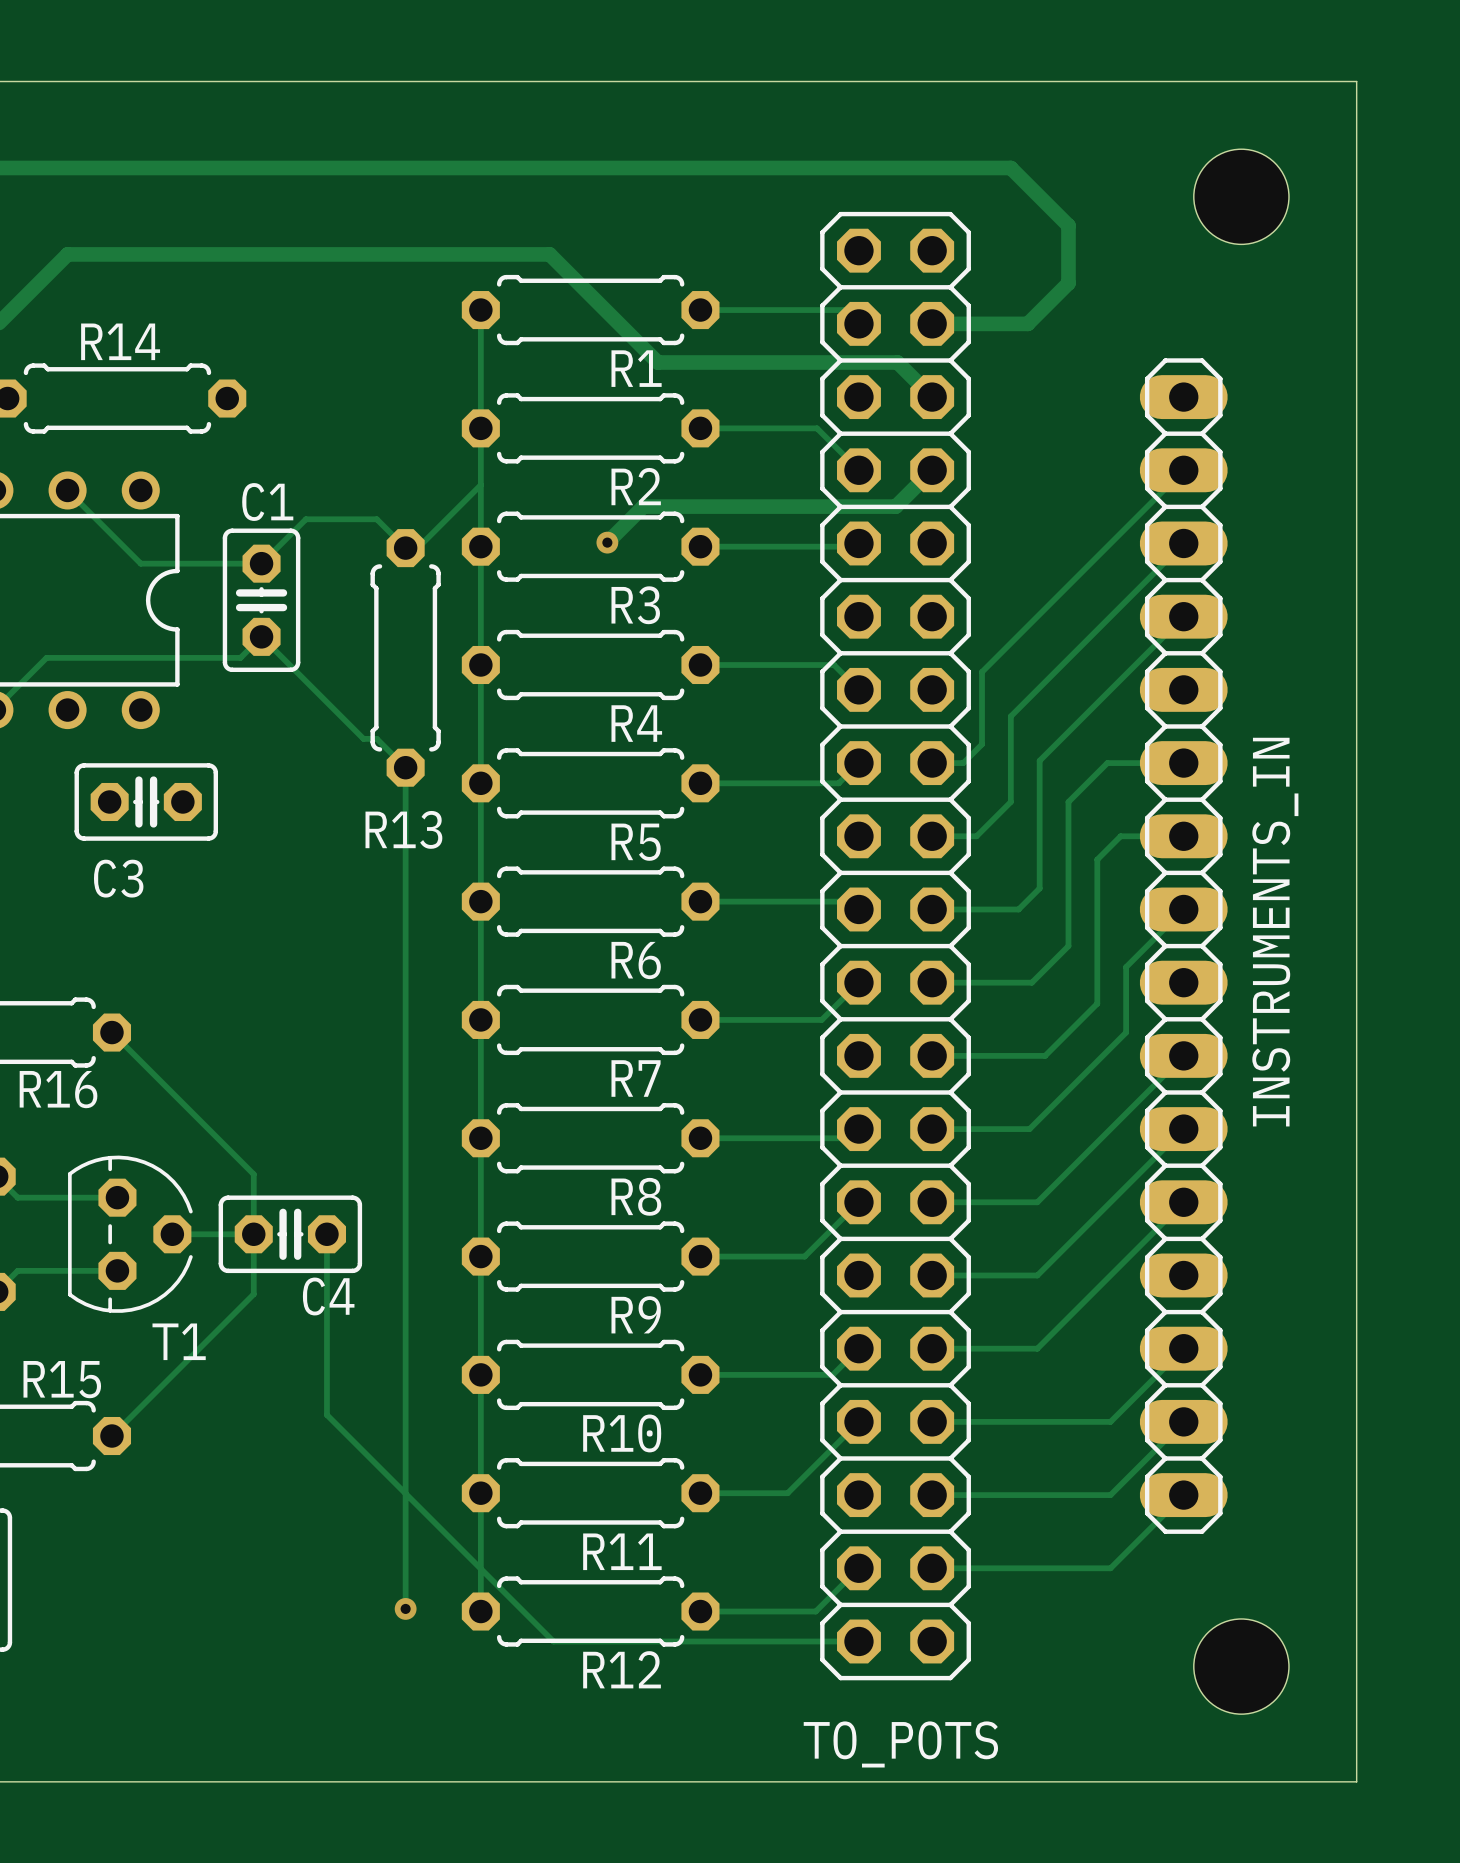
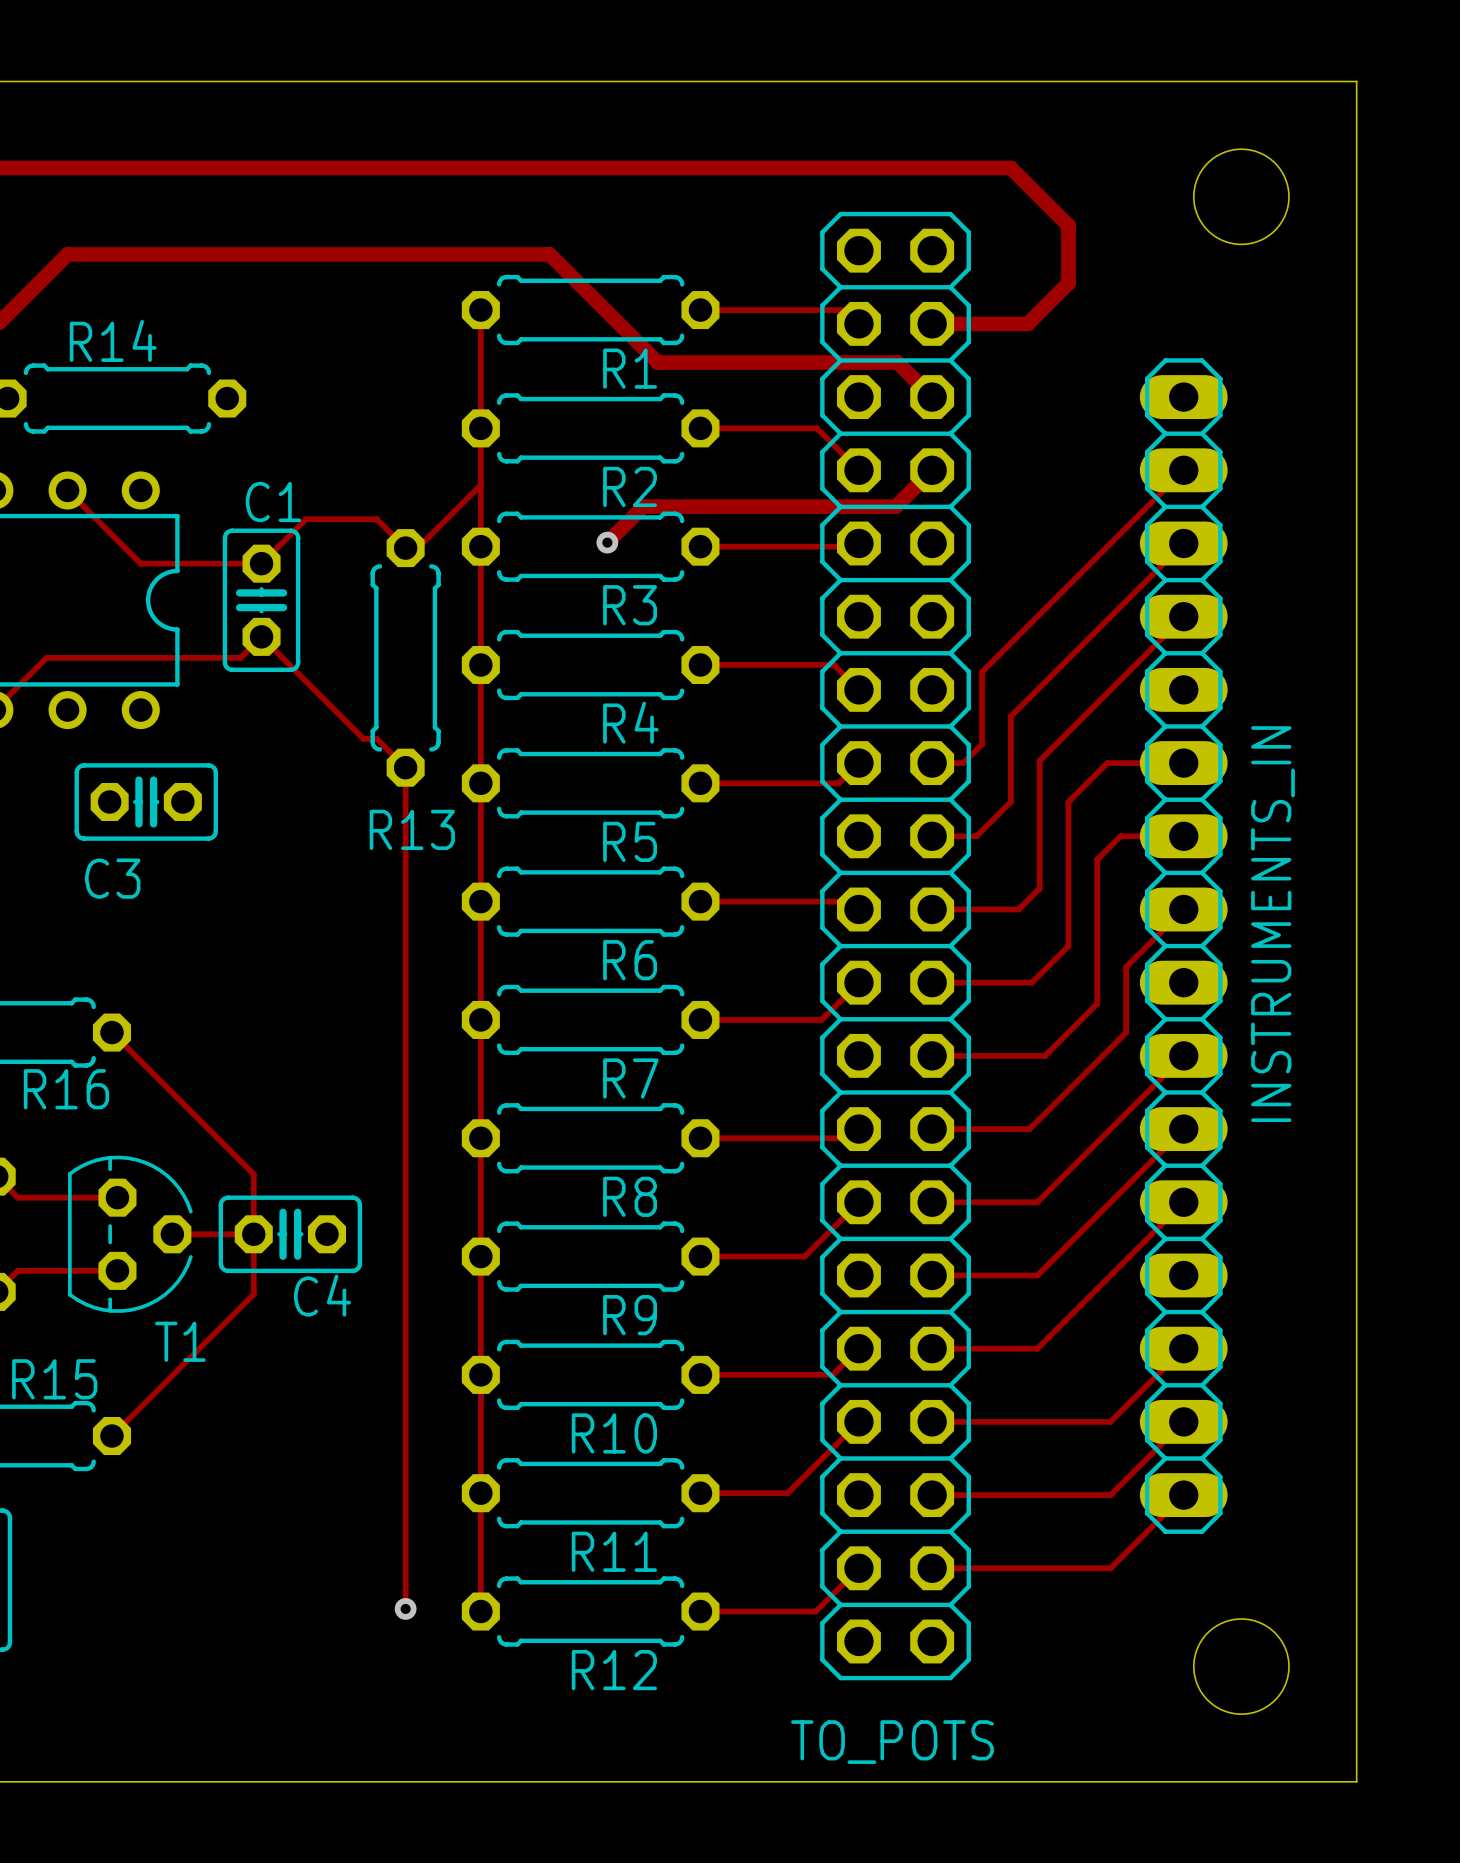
track: (326, 1234) (326, 1414) (553, 1641) (858, 1641) -> none

